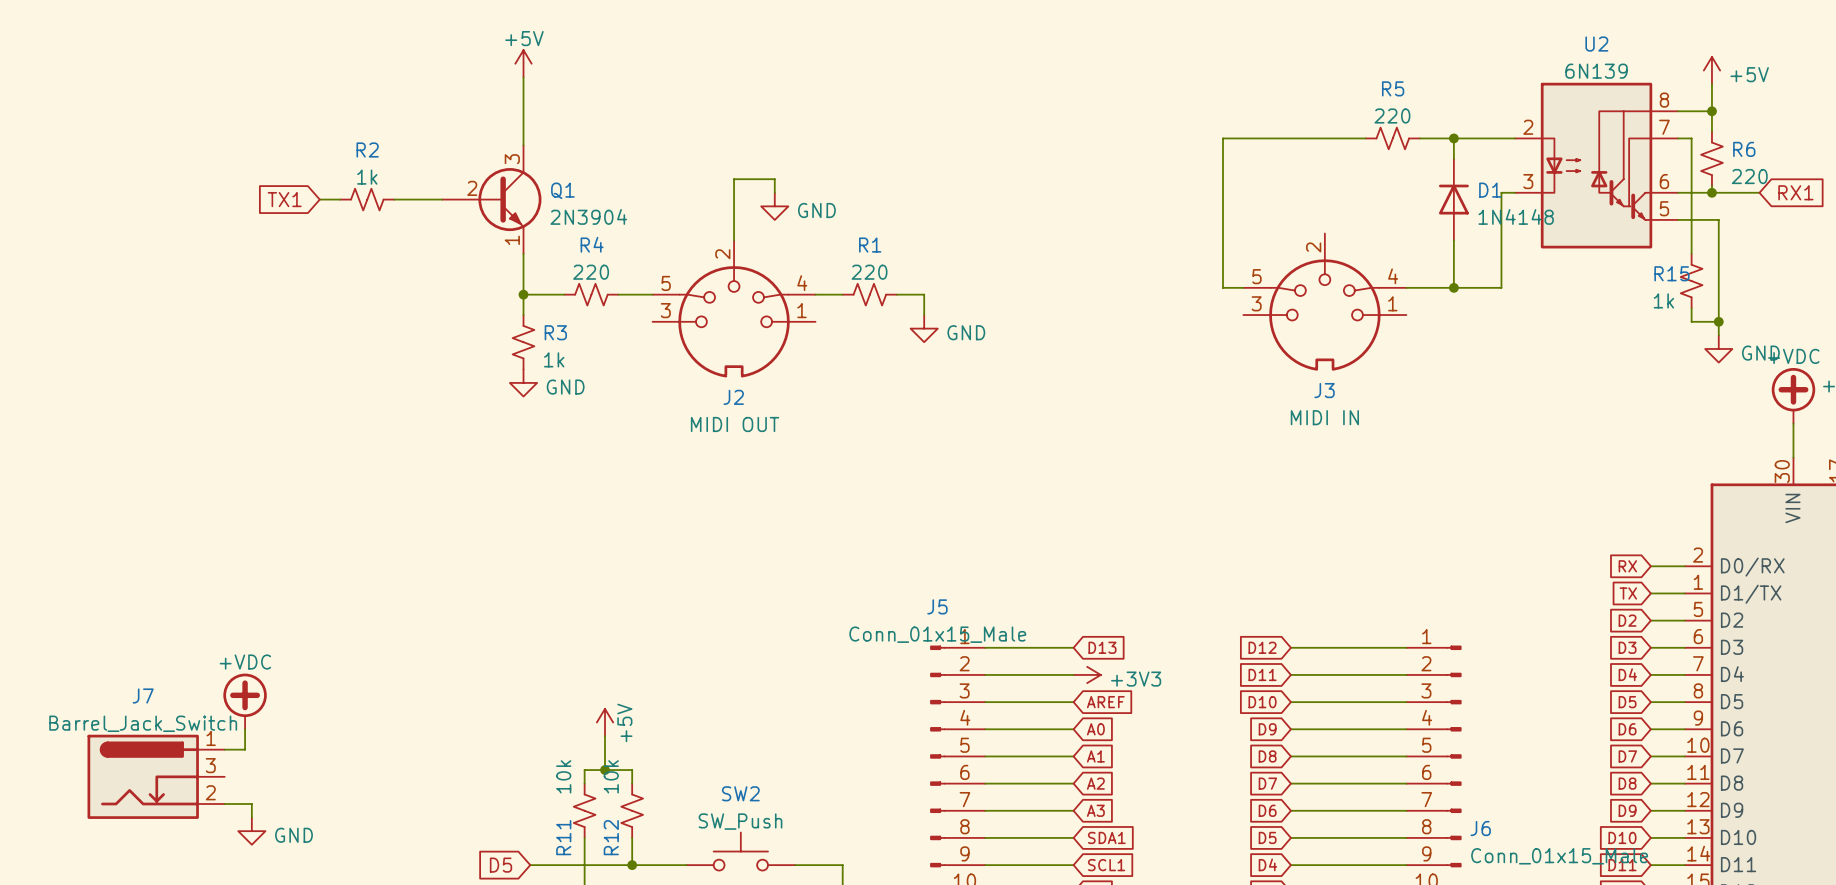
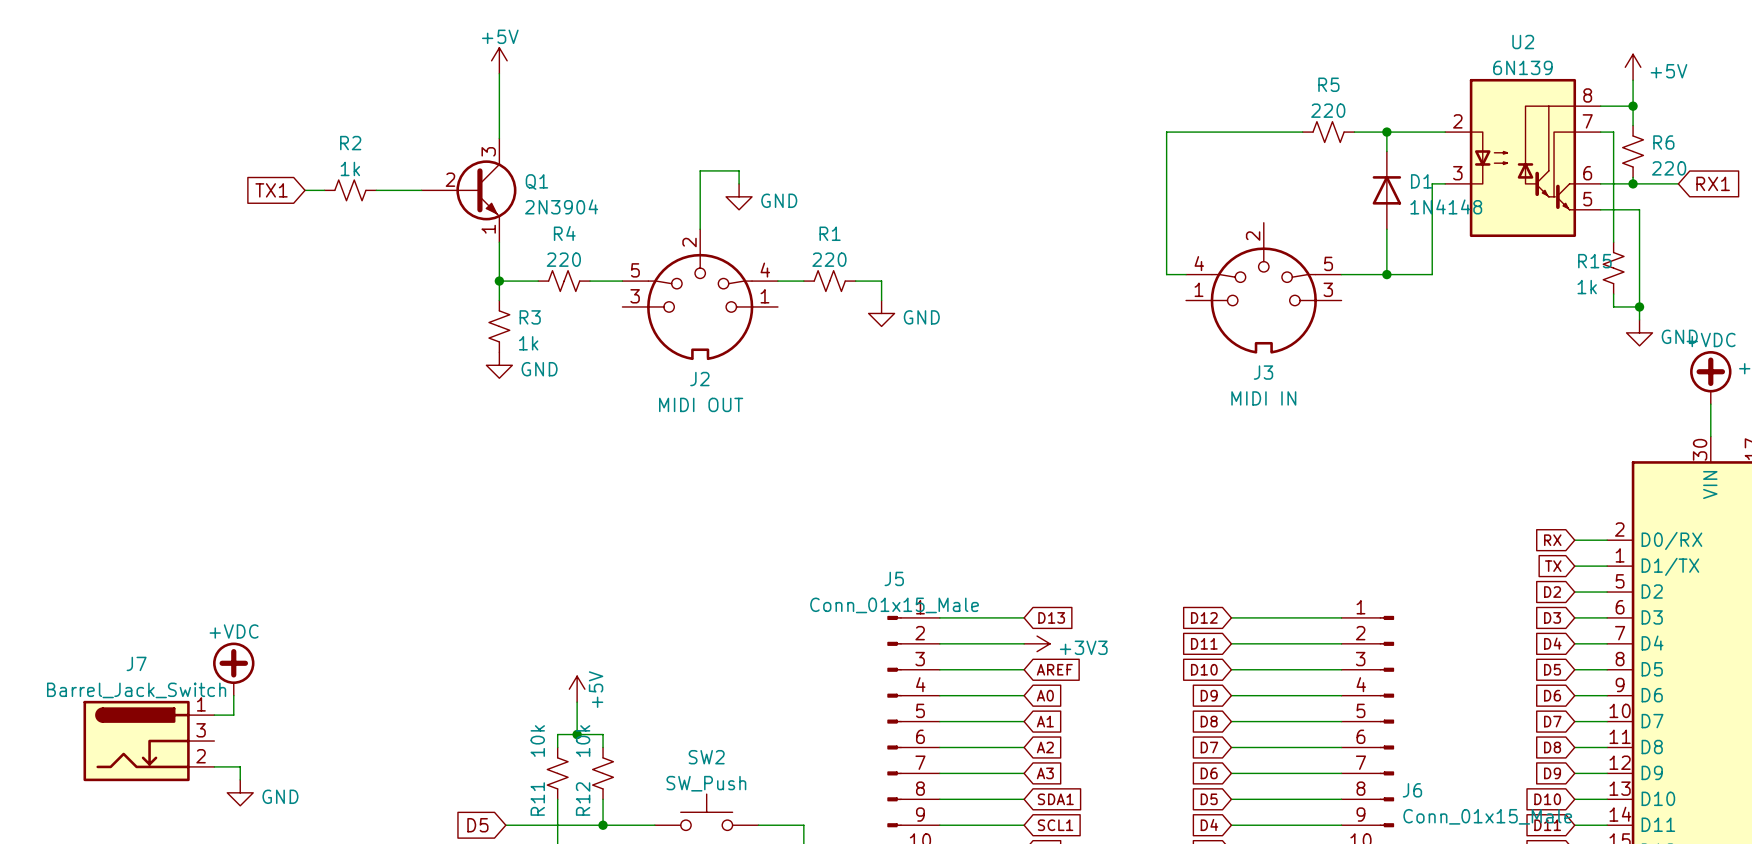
J3 flip: as is (1324, 315) -> left-right (1263, 300)

